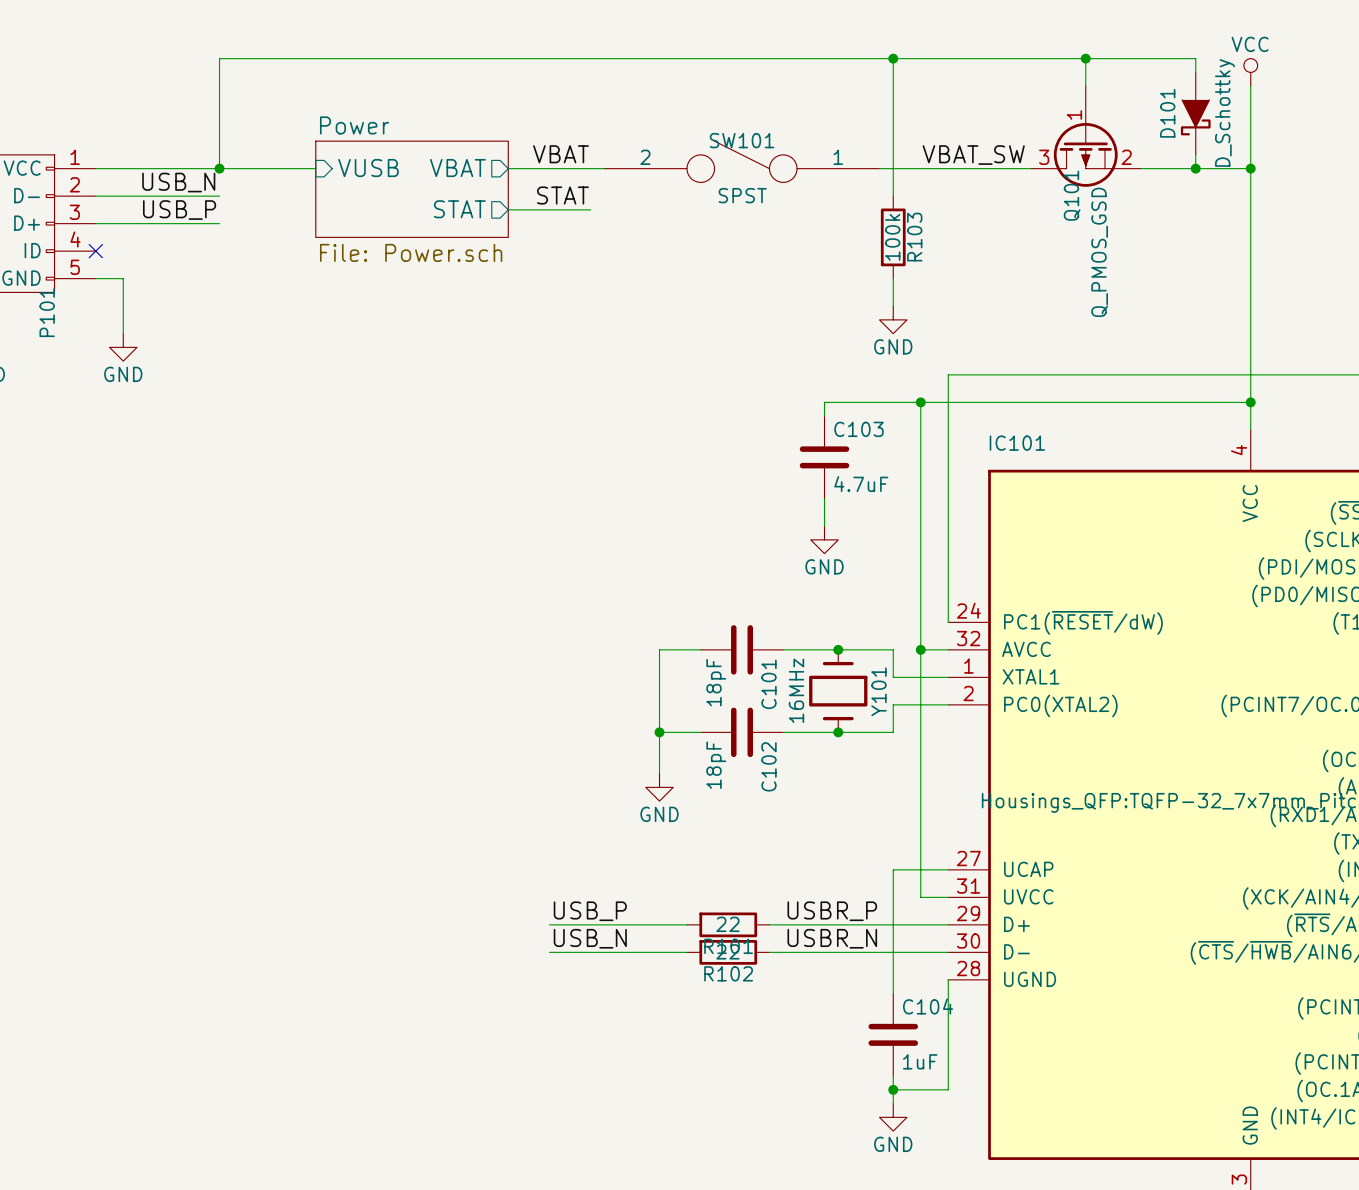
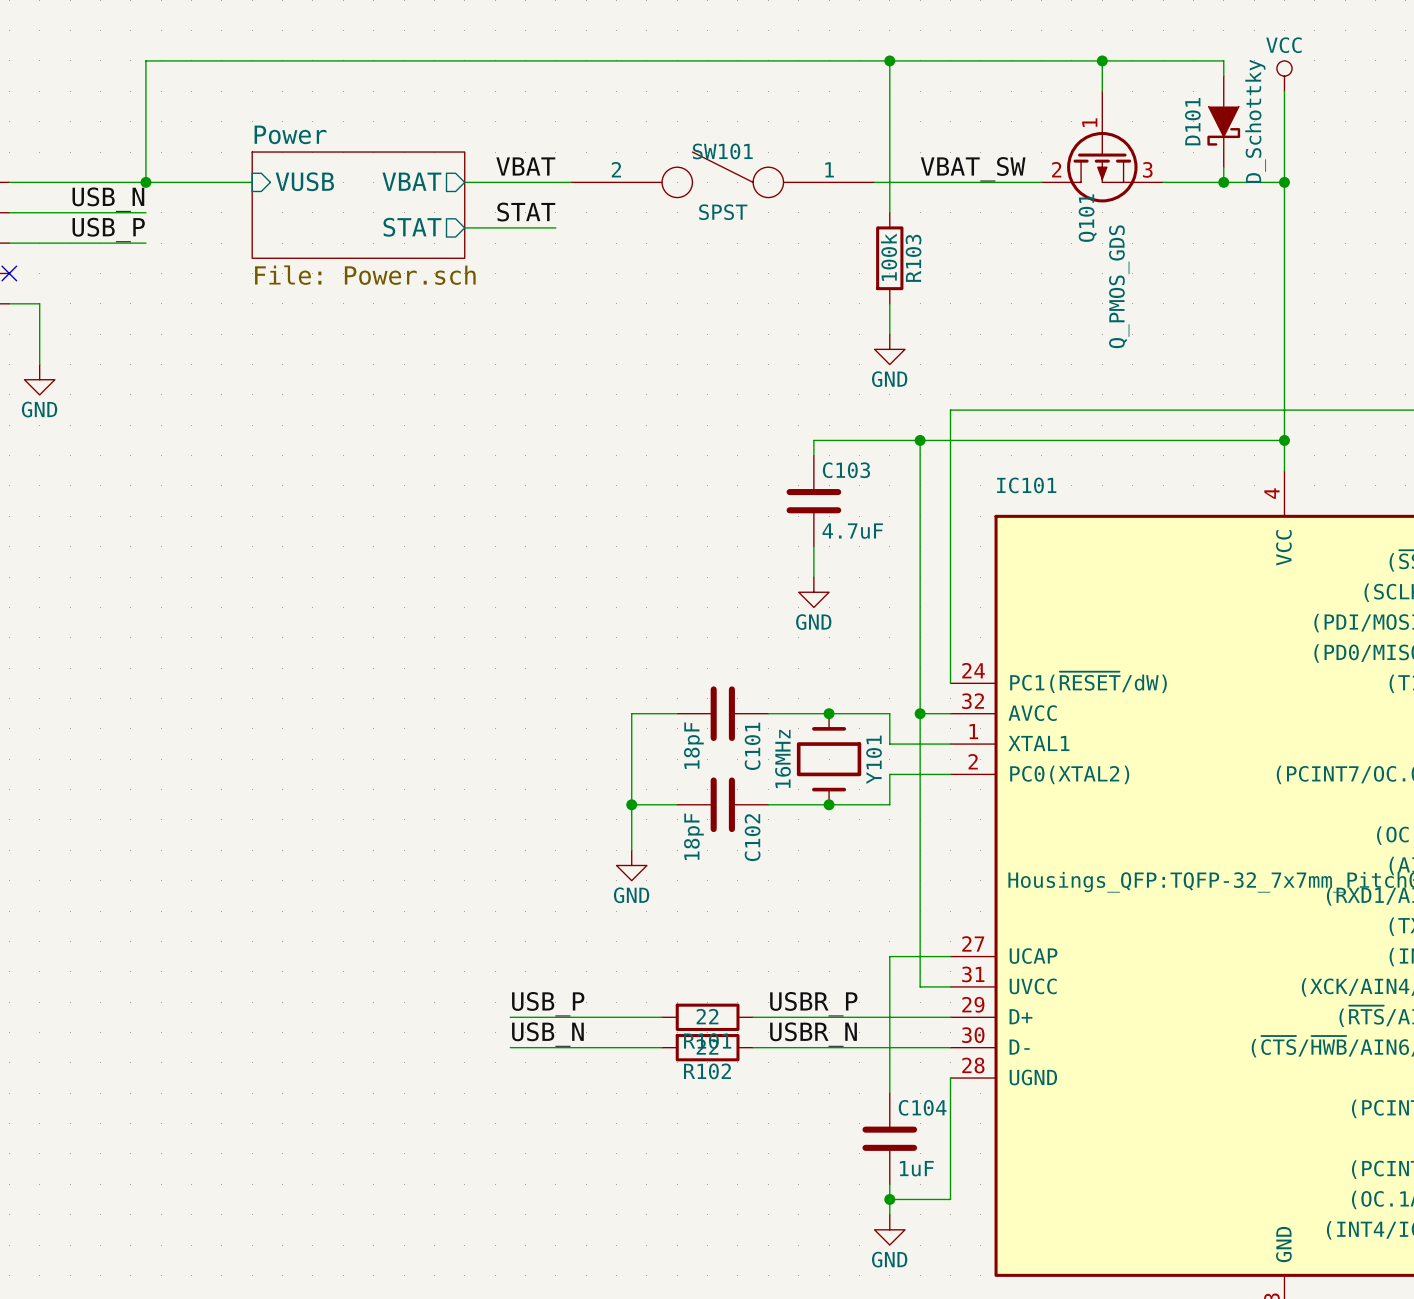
Q101 pin number: 3 (1044, 157) -> 2 (1056, 169)
Q101 pin number: 2 (1126, 157) -> 3 (1147, 169)
Q101 value: Q_PMOS_GSD (1099, 252) -> Q_PMOS_GDS (1119, 286)

